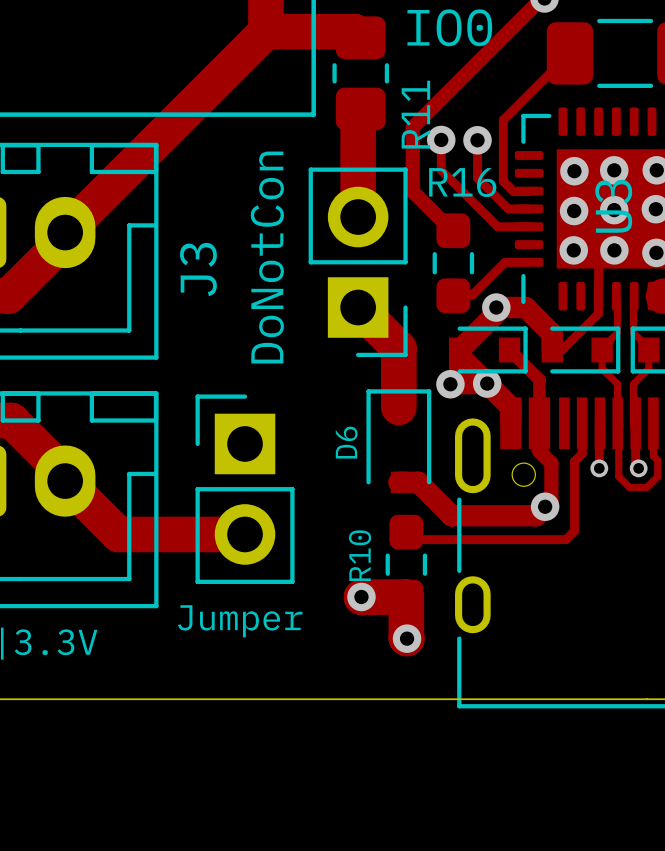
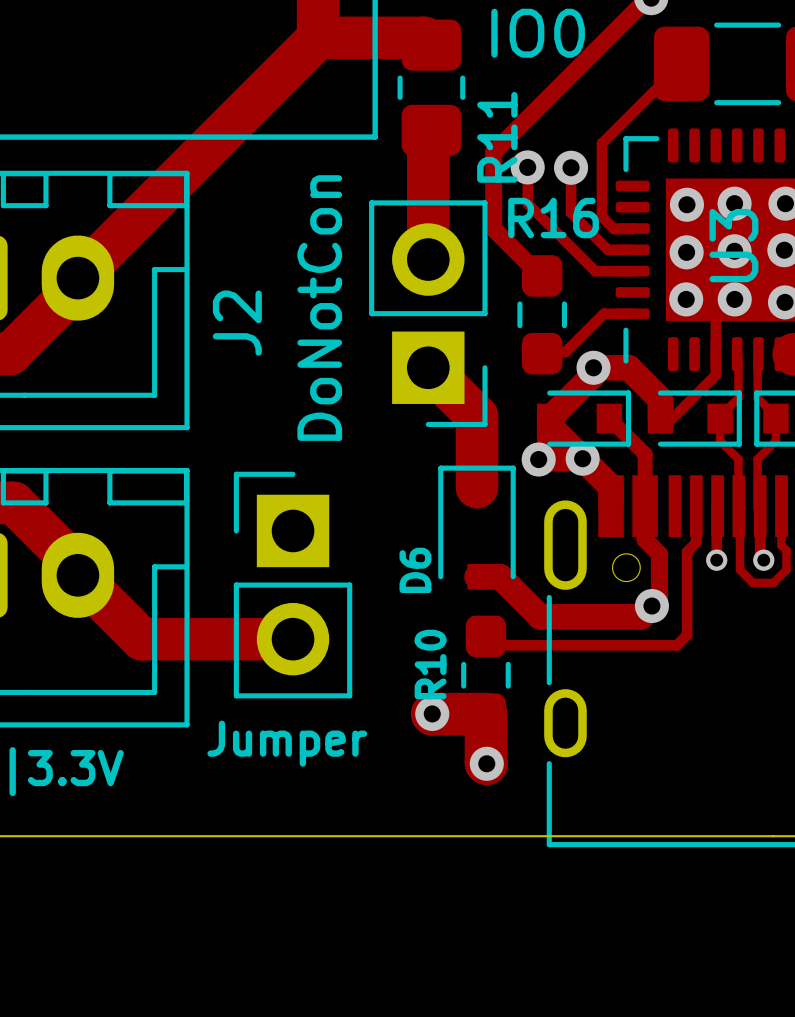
J3 name: J3 (198, 269) -> J2 (237, 323)
D6 name position: D6 (346, 442) -> D6 (415, 570)

